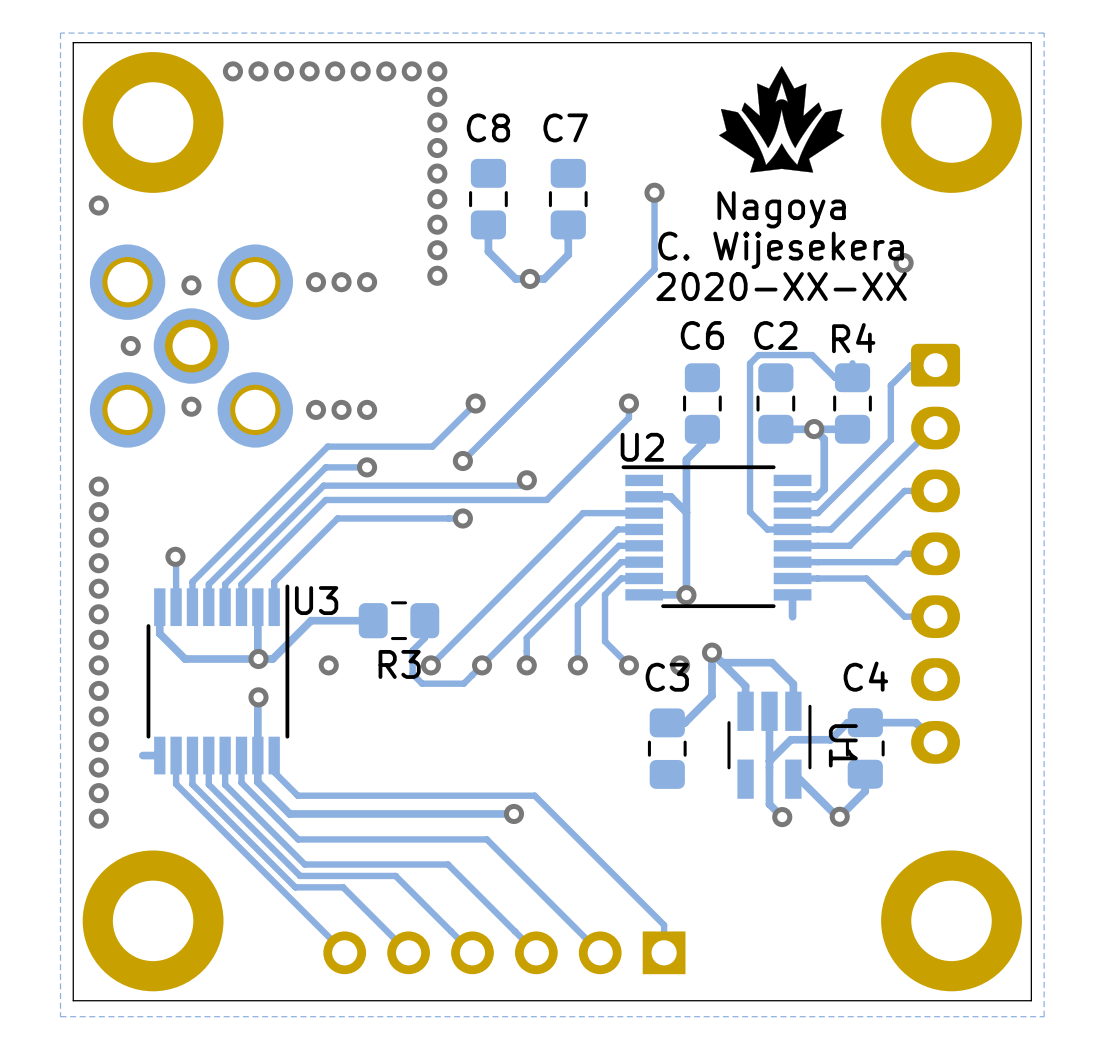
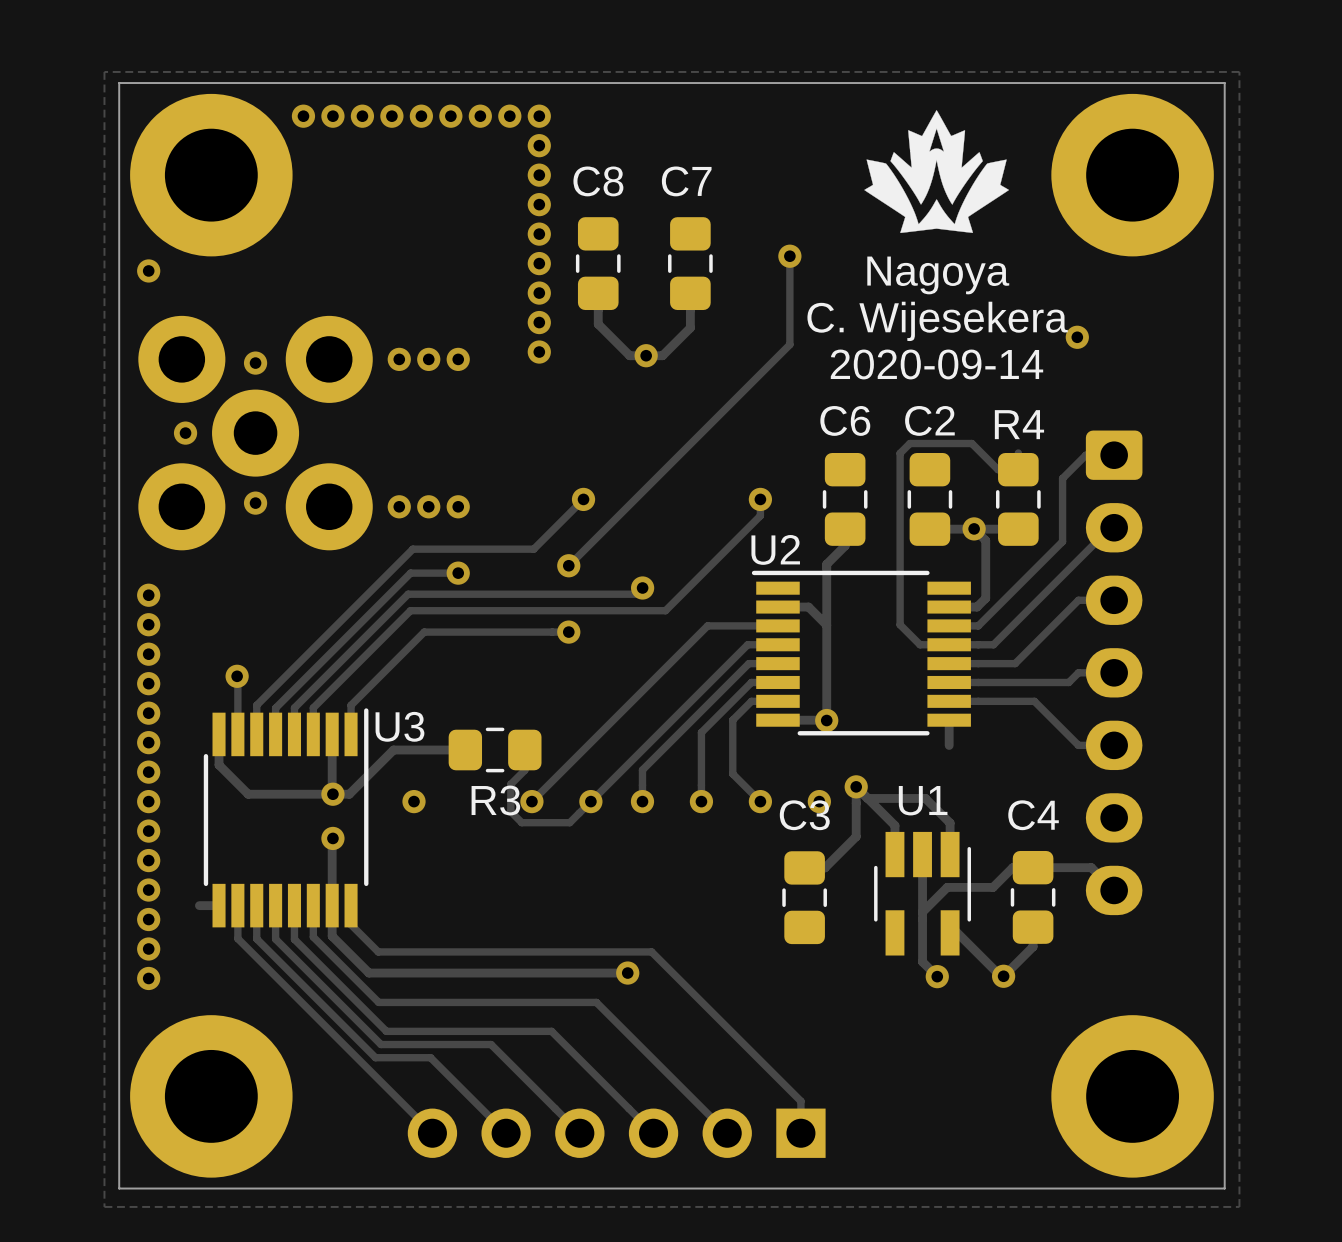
text: 2020-XX-XX (781, 286) -> 2020-09-14 (936, 364)
U1 name rotation: 0° (843, 745) -> 90° counterclockwise (923, 800)
U1 name position: U1 (843, 745) -> U1 (923, 800)

